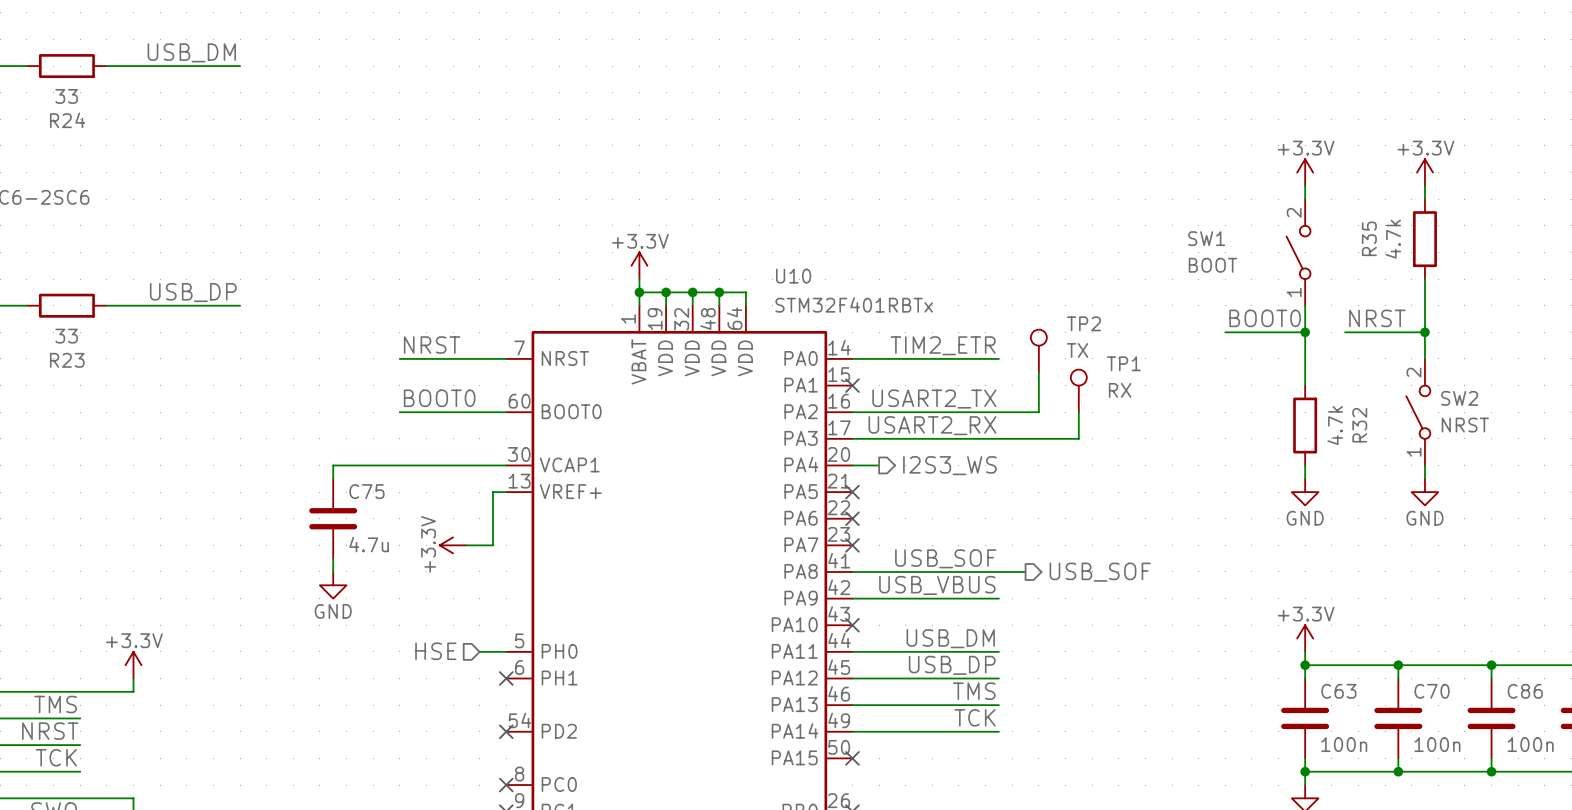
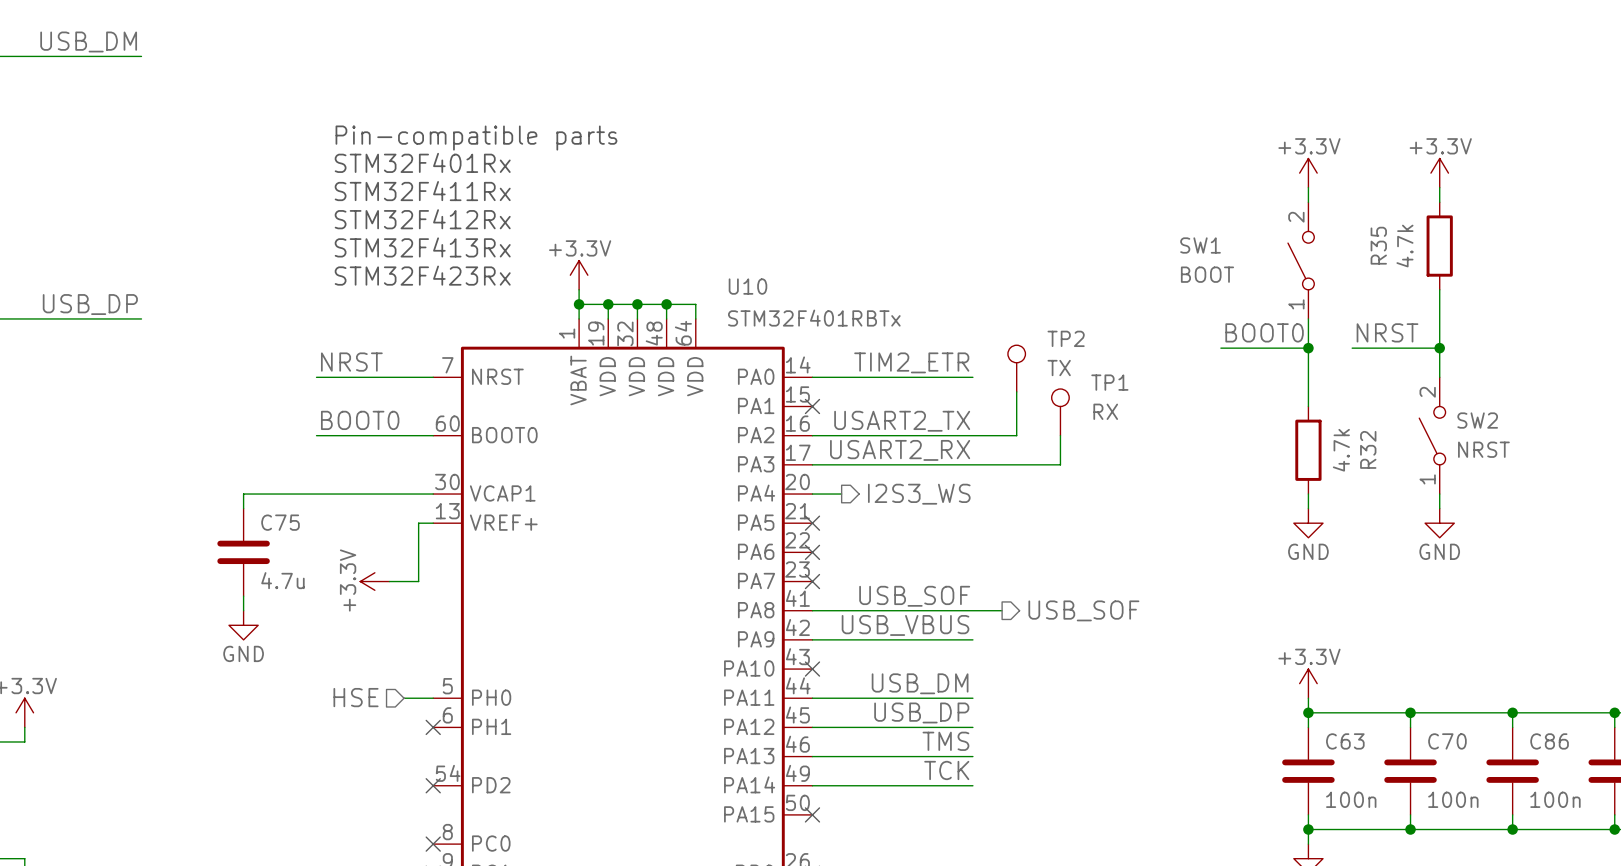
text: none -> Pin-compatible parts (476, 138)
text: none -> STM32F401Rx (422, 162)
text: none -> STM32F411Rx (422, 191)
text: none -> STM32F412Rx (422, 219)
text: none -> STM32F413Rx (422, 247)
text: none -> STM32F423Rx (422, 275)

